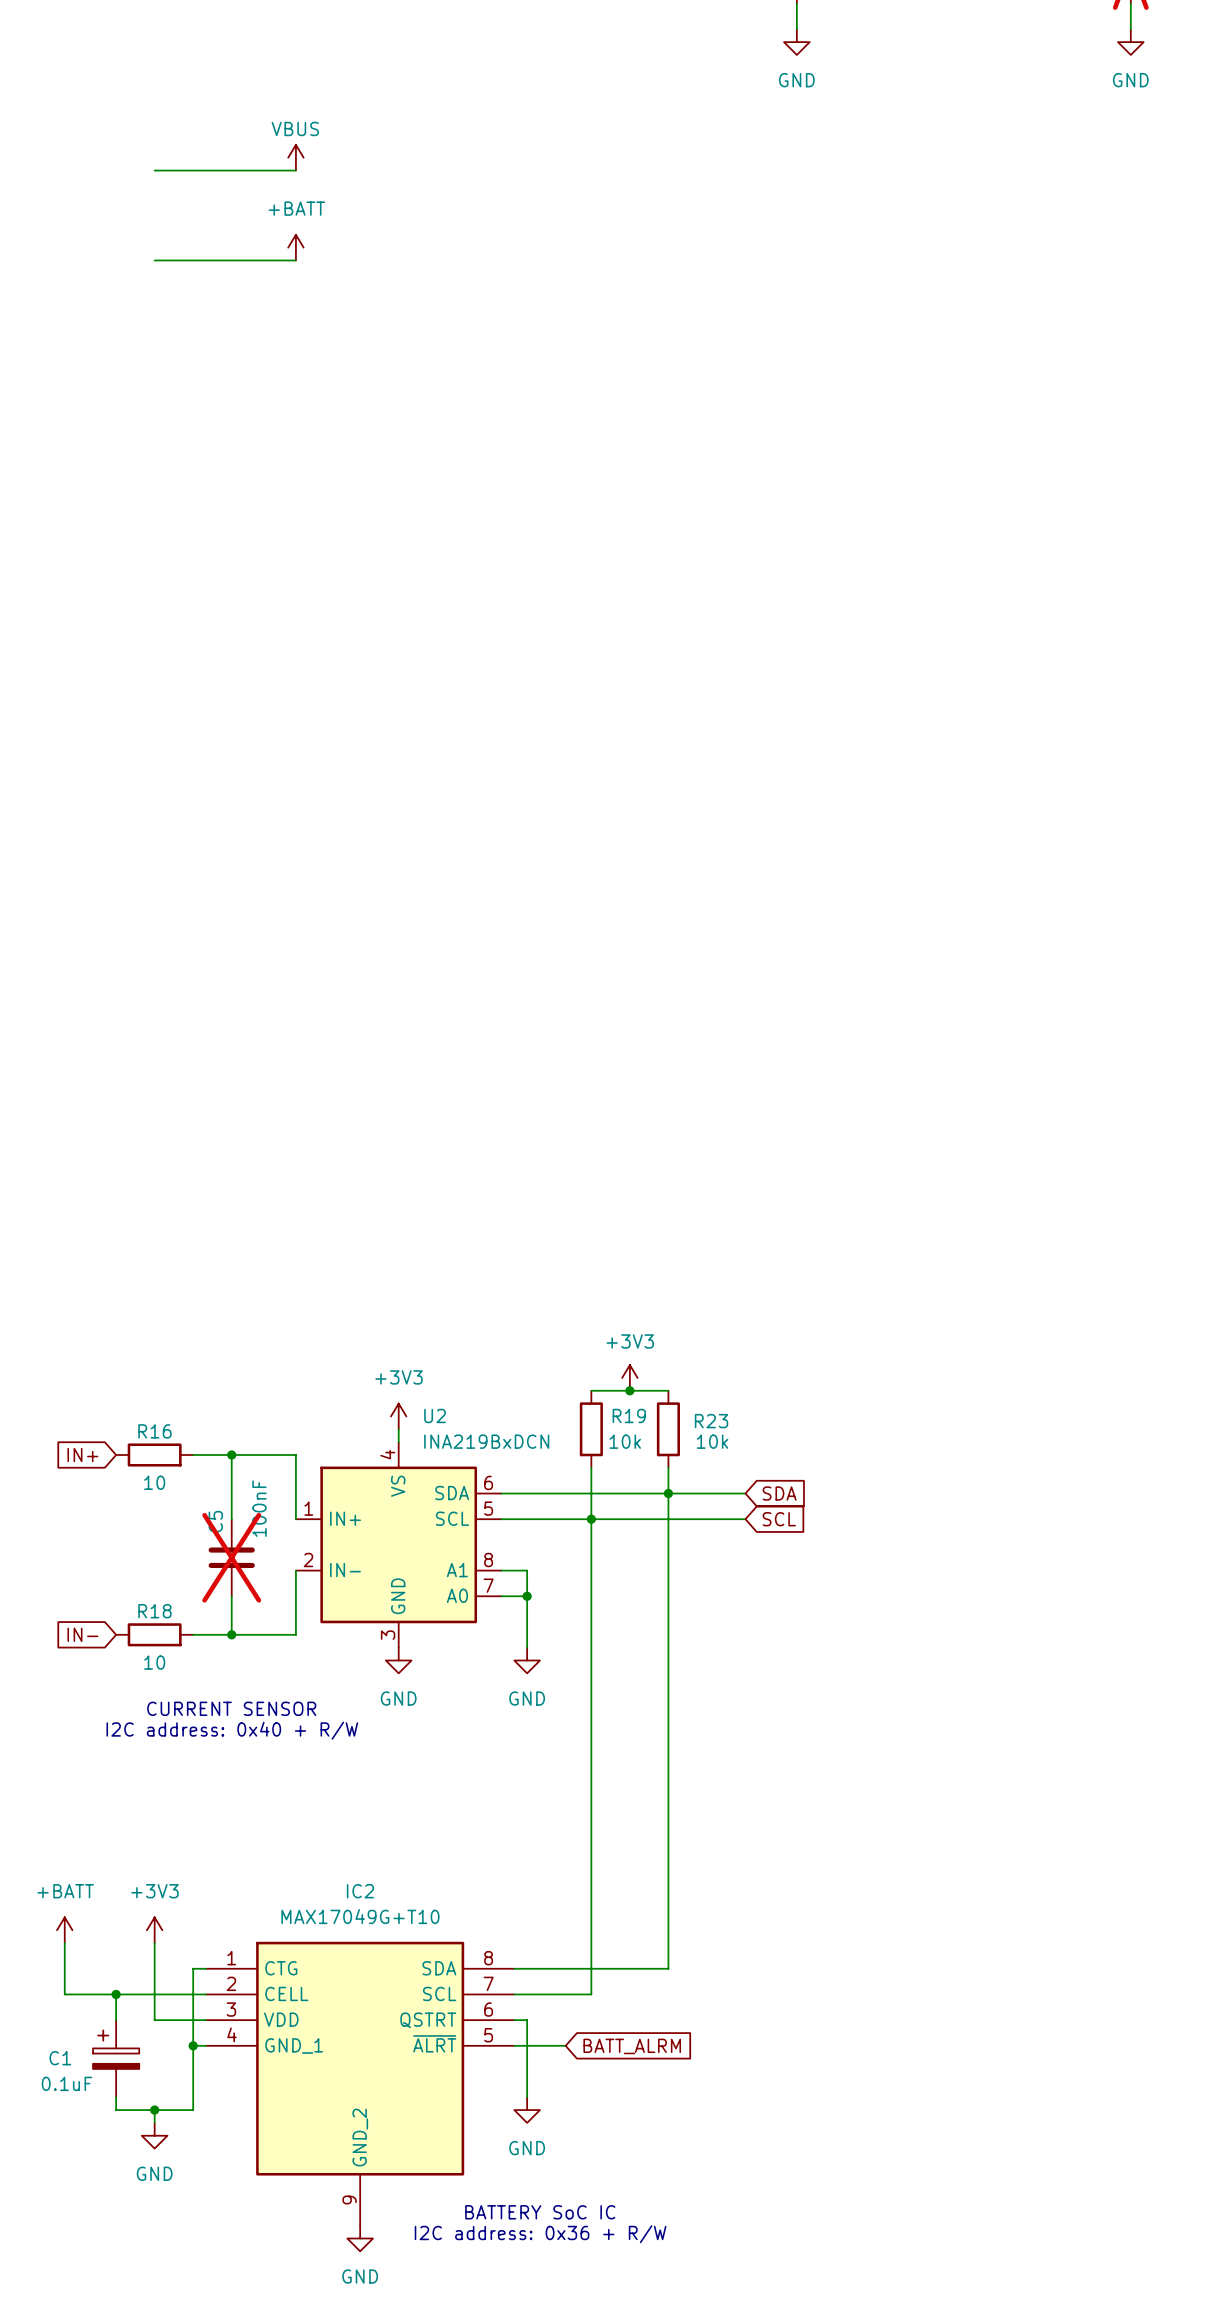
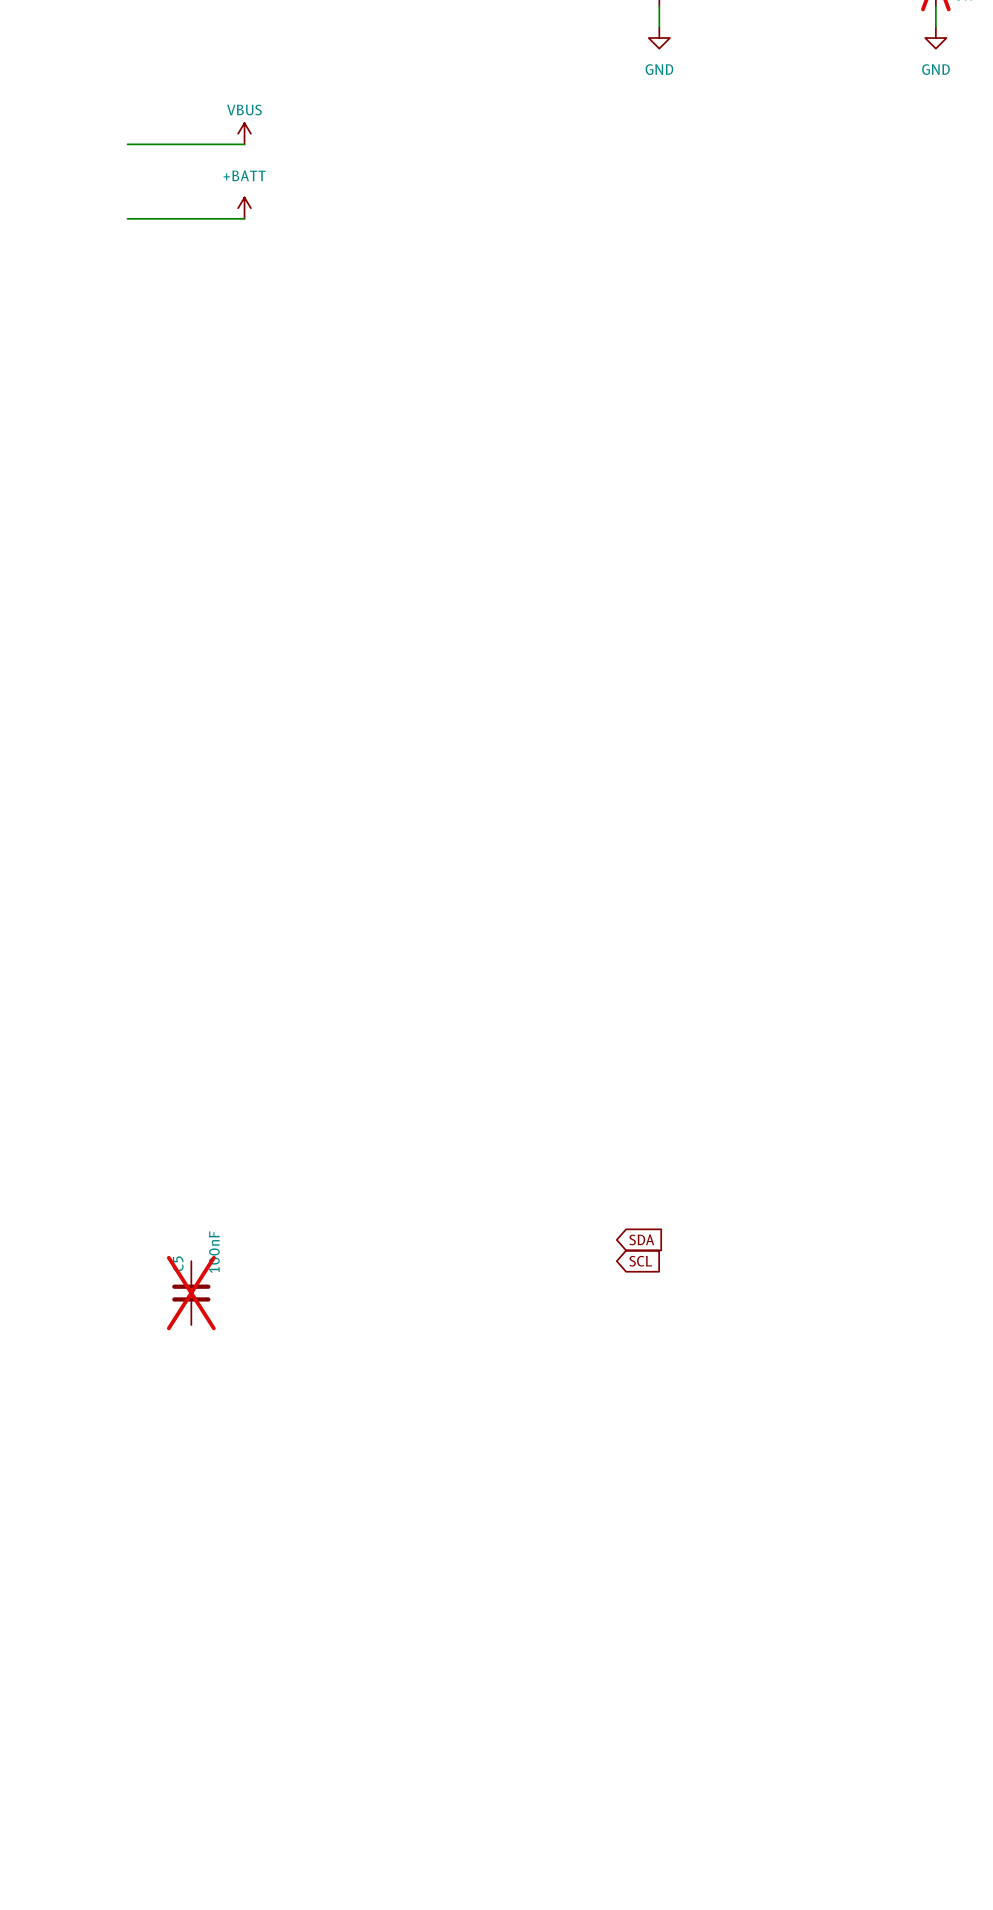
power symbol: +3V3 (629, 1377) -> none
wire: (591, 1390) (668, 1390) -> none
junction: (629, 1390) -> none
power symbol: +3V3 (398, 1416) -> none
wire: (398, 1429) (398, 1442) -> none
R19: 10k (591, 1429) -> none
R23: 10k (668, 1429) -> none
global label: IN+ (82, 1454) -> none
R16: 10 (154, 1454) -> none
wire: (193, 1454) (295, 1454) (295, 1519) -> none
wire: (231, 1454) (231, 1519) -> none
junction: (231, 1454) -> none
wire: (591, 1467) (591, 1994) (514, 1994) -> none
wire: (668, 1467) (668, 1968) (514, 1968) -> none
wire: (501, 1493) (745, 1493) -> none
junction: (668, 1493) -> none
wire: (501, 1519) (745, 1519) -> none
junction: (591, 1519) -> none
U2: INA219BxDCN (398, 1544) -> none
wire: (295, 1570) (295, 1634) (193, 1634) -> none
wire: (501, 1570) (527, 1570) (527, 1647) -> none
wire: (231, 1596) (231, 1634) -> none
wire: (501, 1596) (527, 1596) -> none
junction: (527, 1596) -> none
global label: IN- (82, 1634) -> none
R18: 10 (154, 1634) -> none
junction: (231, 1634) -> none
power symbol: GND (398, 1660) -> none
power symbol: GND (527, 1660) -> none
text: CURRENT SENSOR (231, 1708) -> none
text: I2C address: 0x40 + R/W (232, 1730) -> none
power symbol: +BATT (64, 1930) -> none
power symbol: +3V3 (154, 1930) -> none
wire: (64, 1943) (64, 1994) (206, 1994) -> none
wire: (154, 1943) (154, 2020) (206, 2020) -> none
wire: (206, 1968) (193, 1968) (193, 2110) (116, 2110) (116, 2097) -> none
wire: (116, 1994) (116, 2020) -> none
junction: (116, 1994) -> none
wire: (514, 2020) (527, 2020) (527, 2097) -> none
wire: (193, 2045) (206, 2045) -> none
junction: (193, 2045) -> none
wire: (514, 2045) (565, 2045) -> none
global label: BATT_ALRM (632, 2046) -> none
C1: 0.1uF (116, 2058) -> none
IC2: MAX17049G+T10 (360, 2083) -> none
wire: (154, 2110) (154, 2122) -> none
junction: (154, 2110) -> none
power symbol: GND (527, 2110) -> none
power symbol: GND (154, 2135) -> none
text: BATTERY SoC IC (540, 2212) -> none
text: I2C address: 0x36 + R/W (540, 2234) -> none
power symbol: GND (360, 2238) -> none

